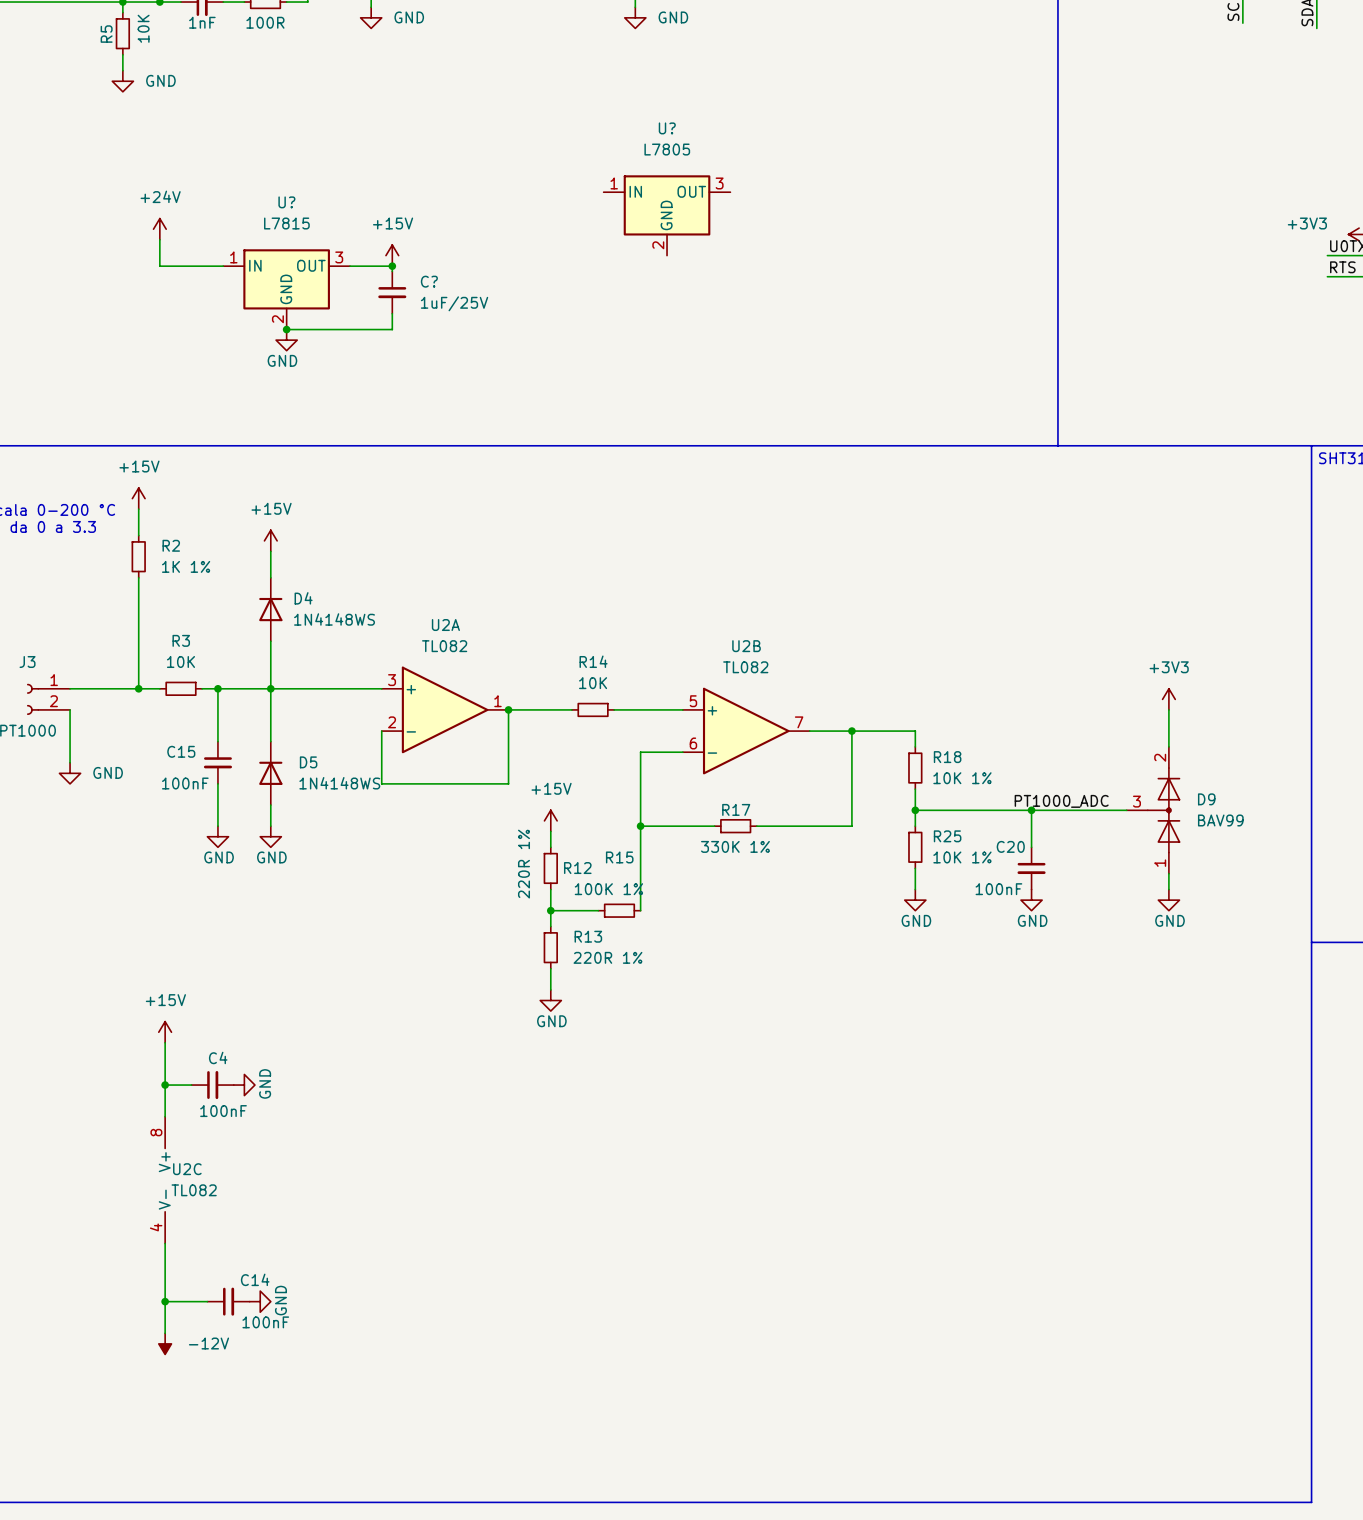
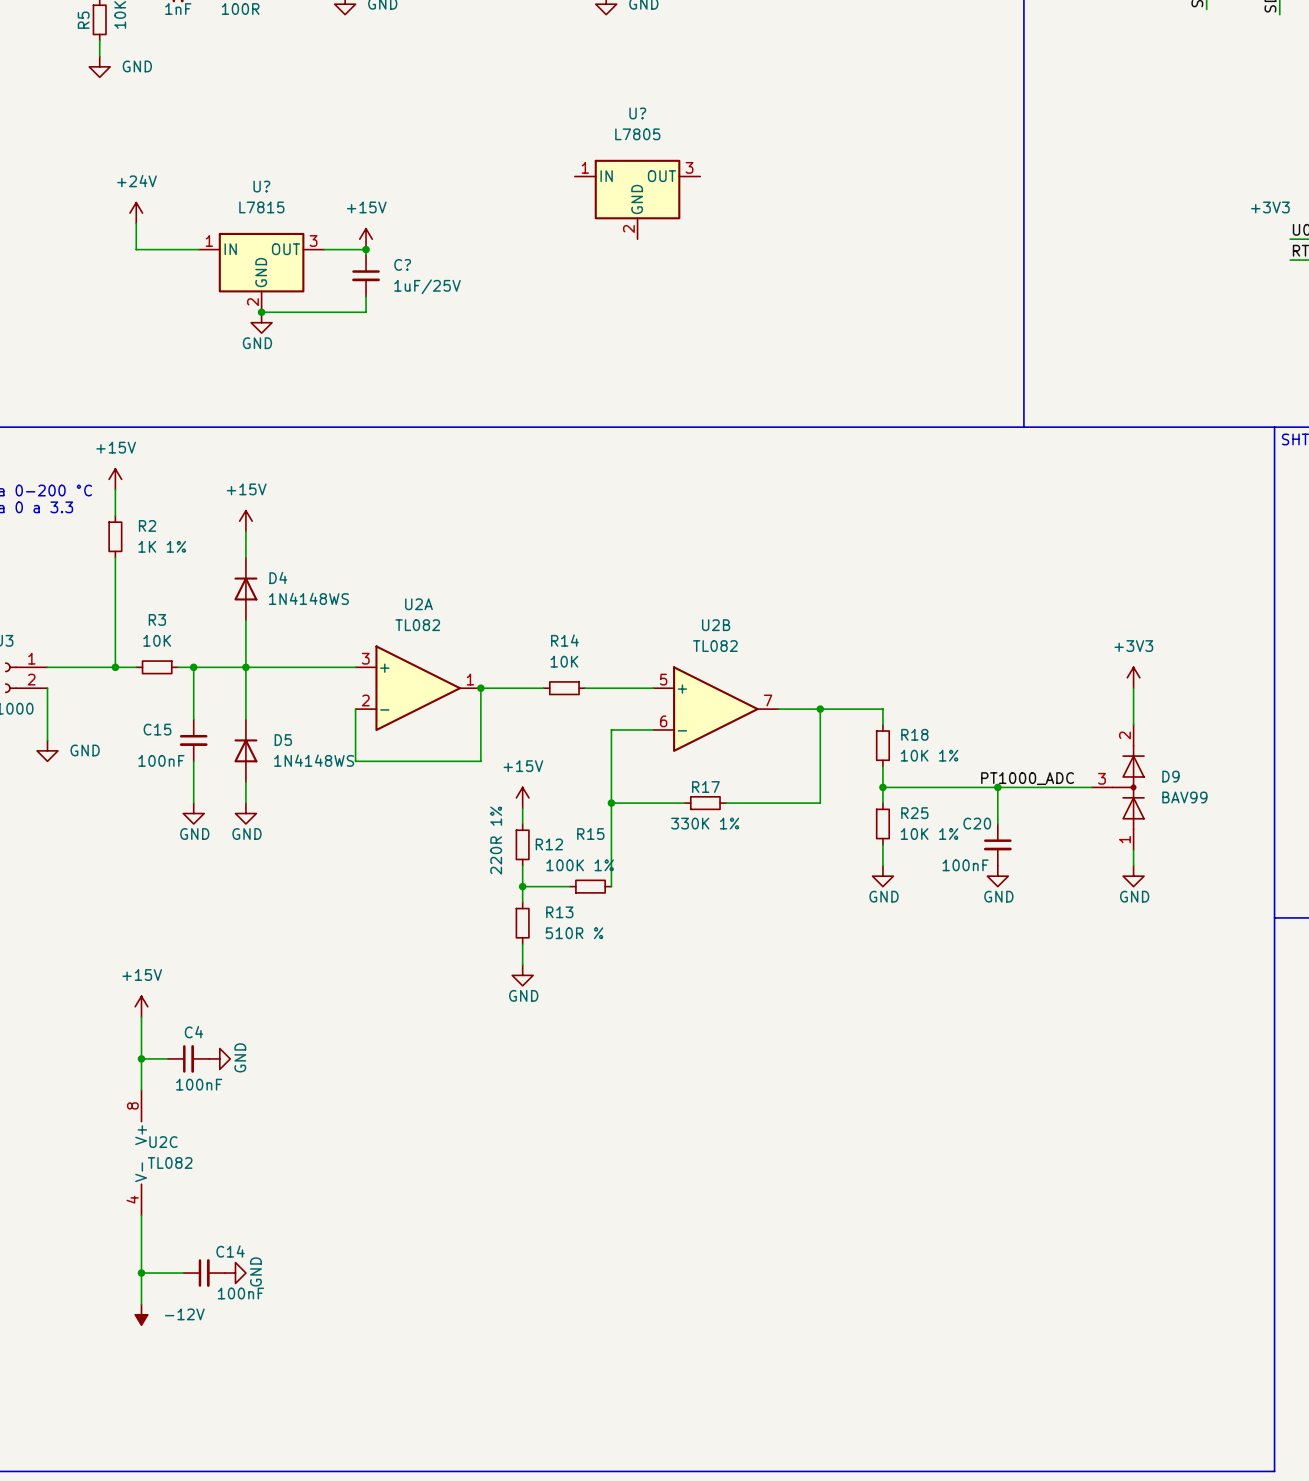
R13 value: 220R 1% (607, 957) -> 510R % (574, 933)

